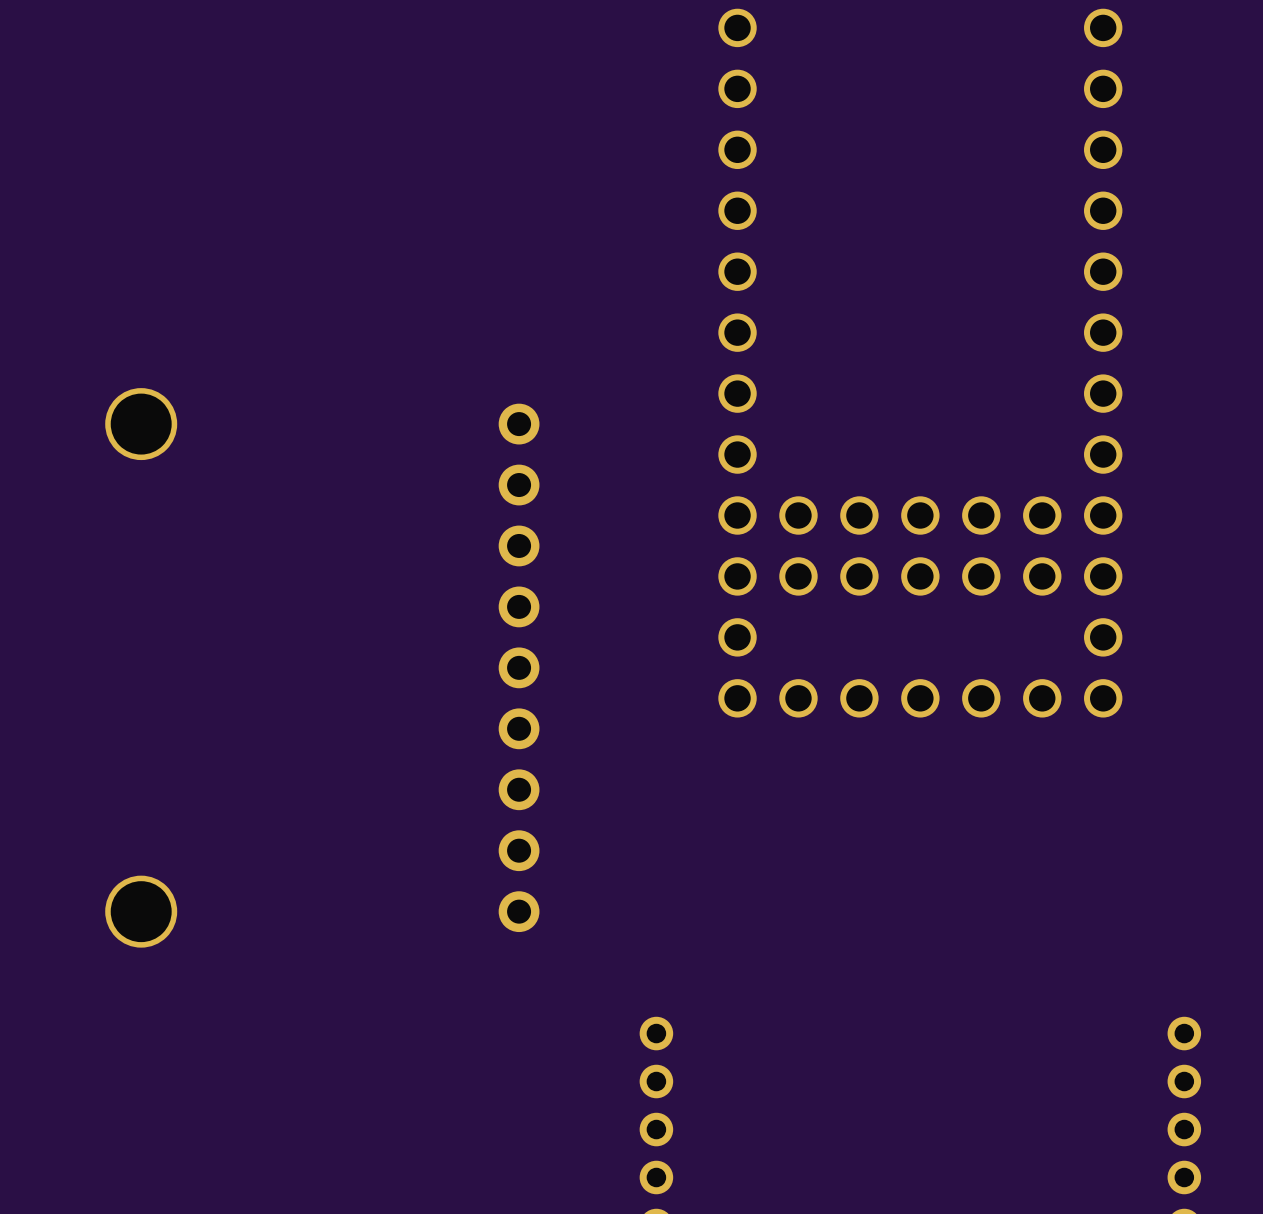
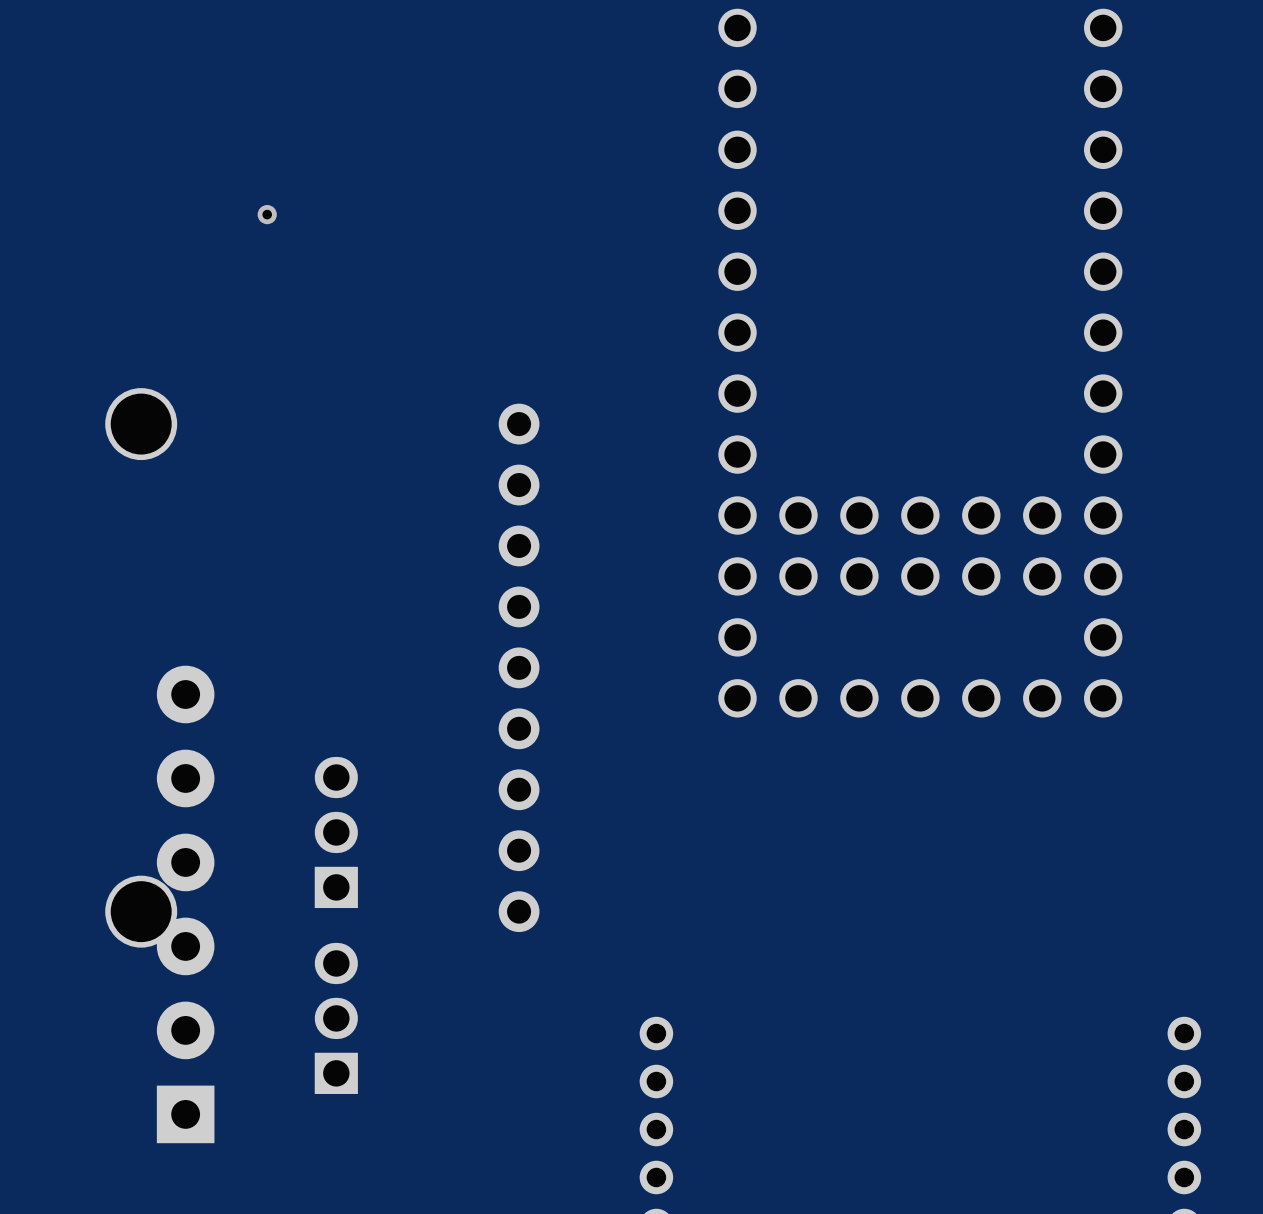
via: none -> (267, 214)
part: none -> (336, 832)
part: none -> (185, 904)
part: none -> (336, 1018)

